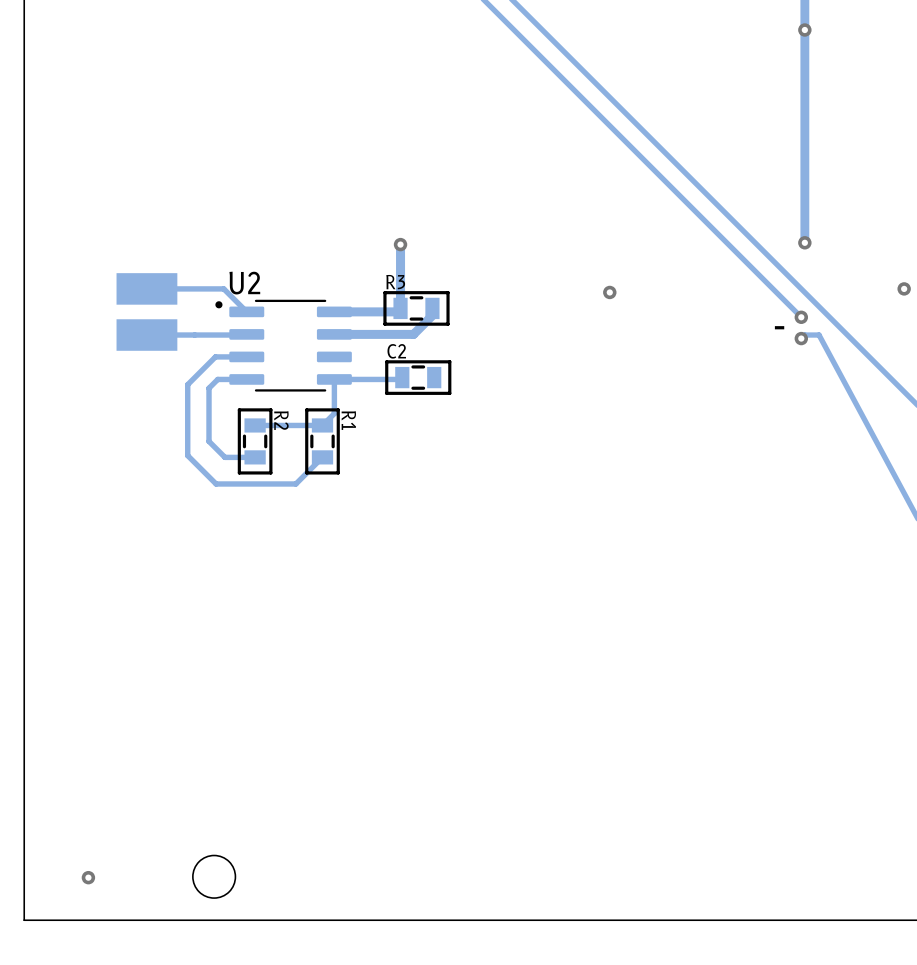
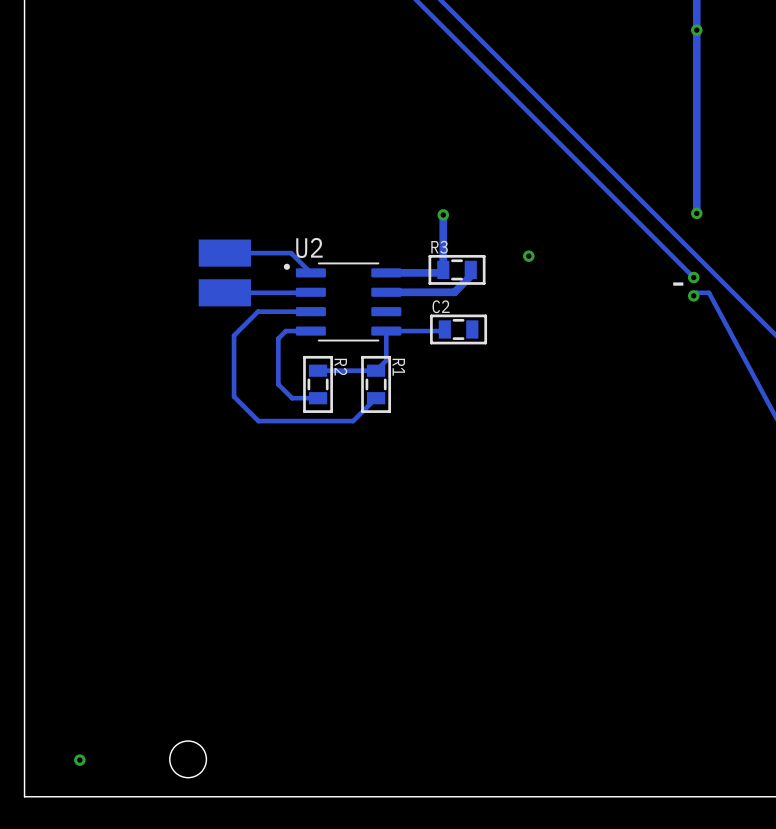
track: (400, 244) (400, 308) (397, 311) (334, 311) -> (443, 214) (443, 269) (440, 272) (386, 272)
via: (400, 244) -> none
via: none -> (443, 214)
track: (146, 288) (223, 288) (246, 311) -> (224, 253) (291, 253) (310, 272)
part: (146, 288) -> none
part: none -> (224, 253)
R3 position: (416, 308) -> (457, 269)
track: (432, 308) (432, 315) (413, 334) (334, 334) -> (470, 269) (470, 276) (454, 292) (386, 292)
track: (246, 334) (146, 335) -> (310, 292) (224, 292)
part: (146, 335) -> none
part: none -> (224, 292)
U2 position: (283, 345) -> (342, 301)
track: (246, 356) (215, 356) (187, 384) (187, 455) (216, 483) (295, 483) (322, 457) -> none
track: none -> (310, 311) (257, 311) (234, 335) (234, 396) (258, 421) (353, 421) (376, 398)
track: (402, 377) (400, 379) (356, 379) -> none
C2 position: (418, 377) -> (458, 329)
track: none -> (444, 329) (443, 331) (386, 331) (386, 360) (376, 370) (318, 370)
track: (246, 379) (217, 379) (209, 388) (209, 441) (224, 457) (255, 457) -> none
track: (334, 379) (334, 413) (322, 425) (255, 425) -> (291, 331) (285, 331) (278, 338) (278, 384) (292, 398) (318, 398)
R2 position: (255, 441) -> (318, 384)
R1 position: (322, 441) -> (376, 384)

